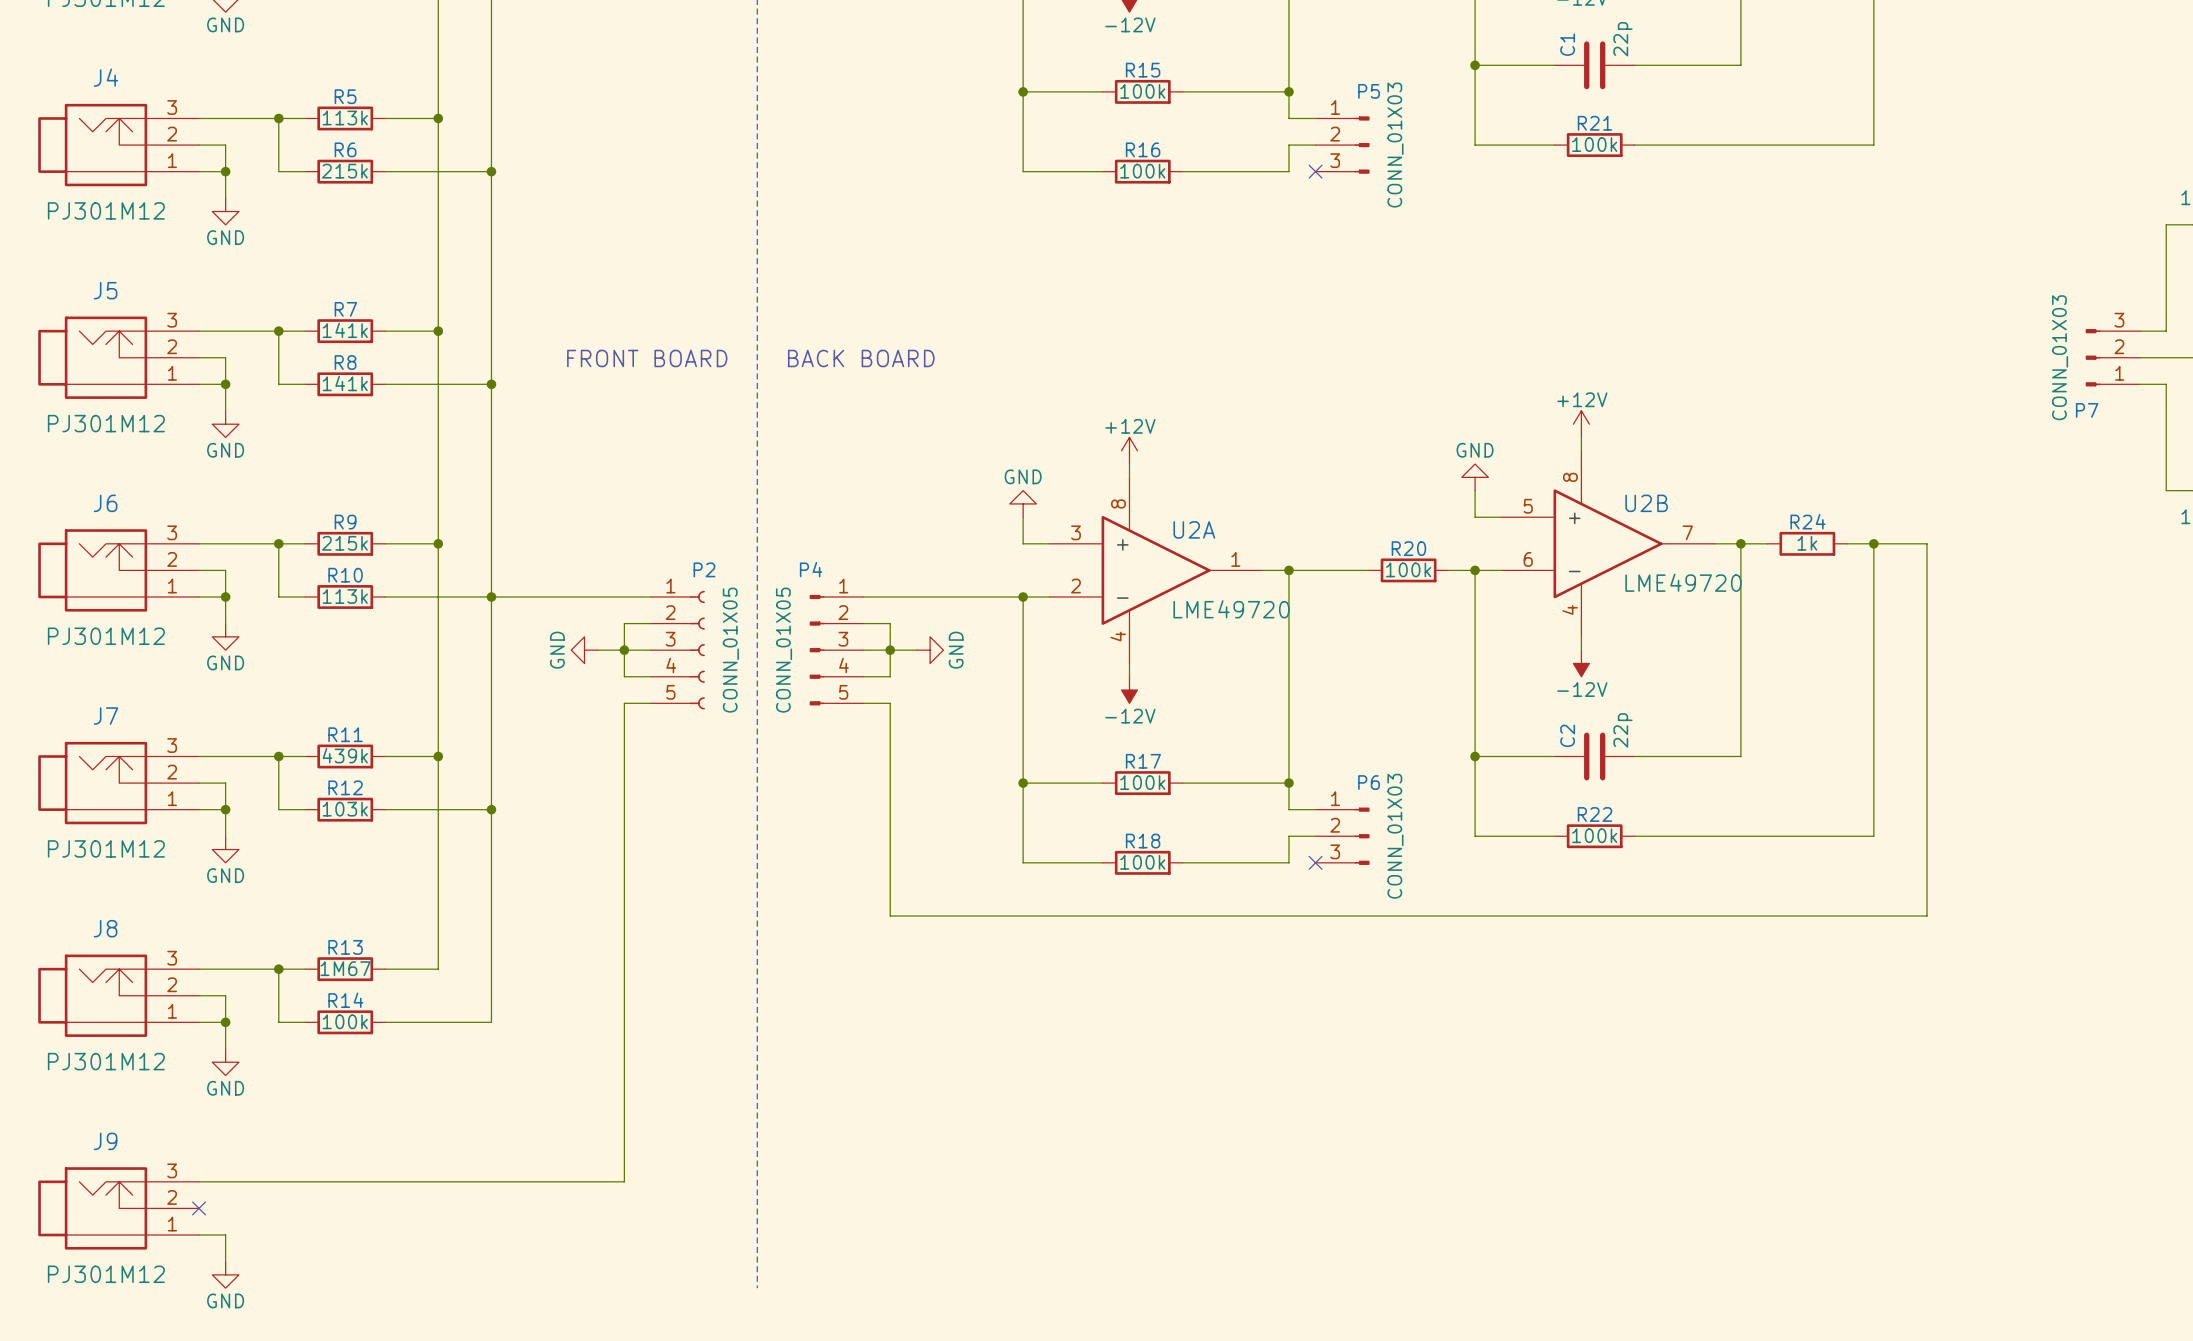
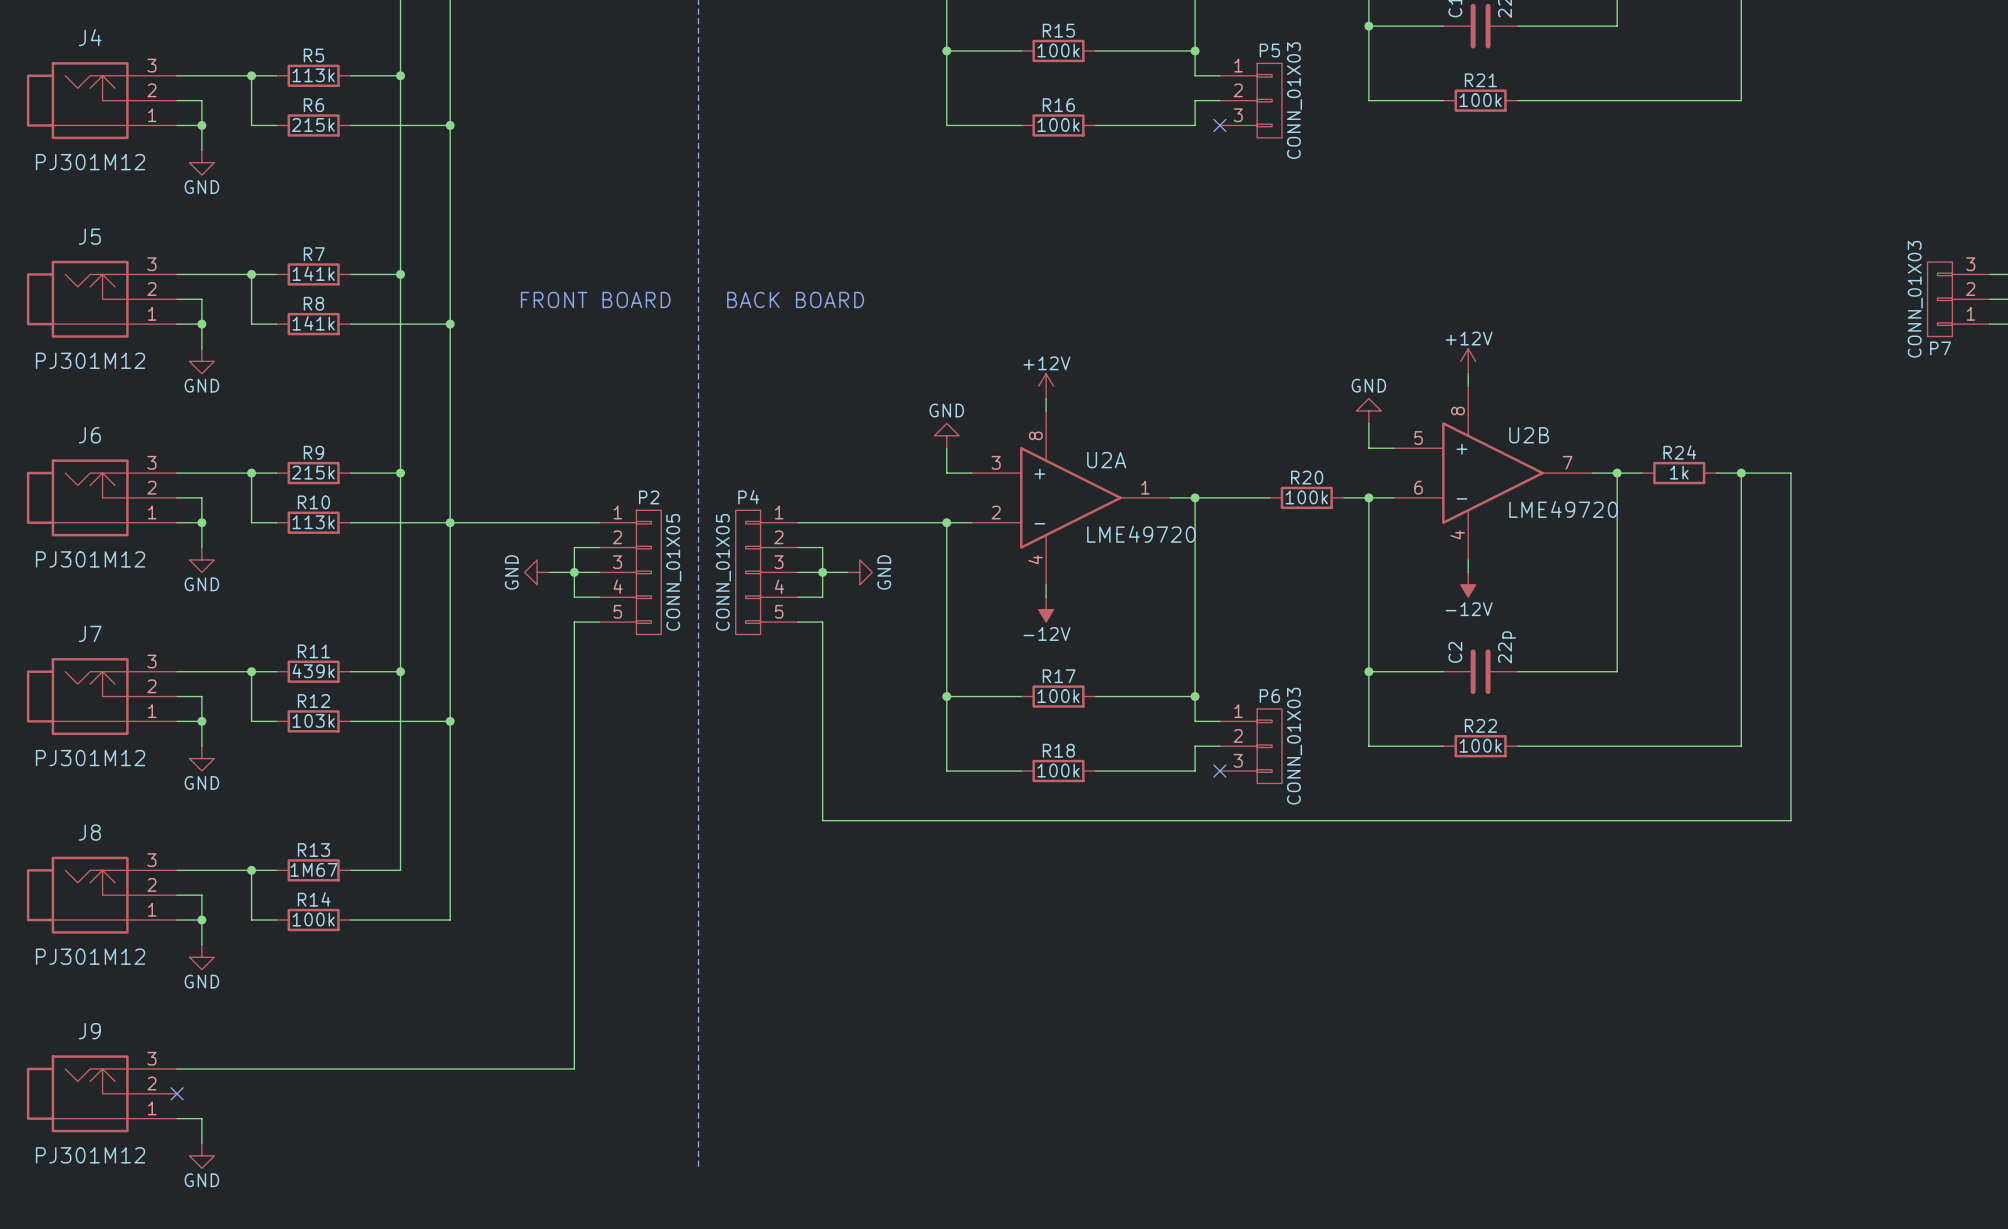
P5 symbol: [1315, 116, 1370, 174] -> [1219, 63, 1282, 138]
P7 symbol: [2085, 329, 2140, 387] -> [1927, 262, 1990, 337]
P2 symbol: [650, 590, 705, 710] -> [599, 510, 662, 635]
P4 symbol: [809, 594, 864, 706] -> [735, 510, 798, 635]
P6 symbol: [1315, 807, 1370, 865] -> [1219, 708, 1282, 784]

